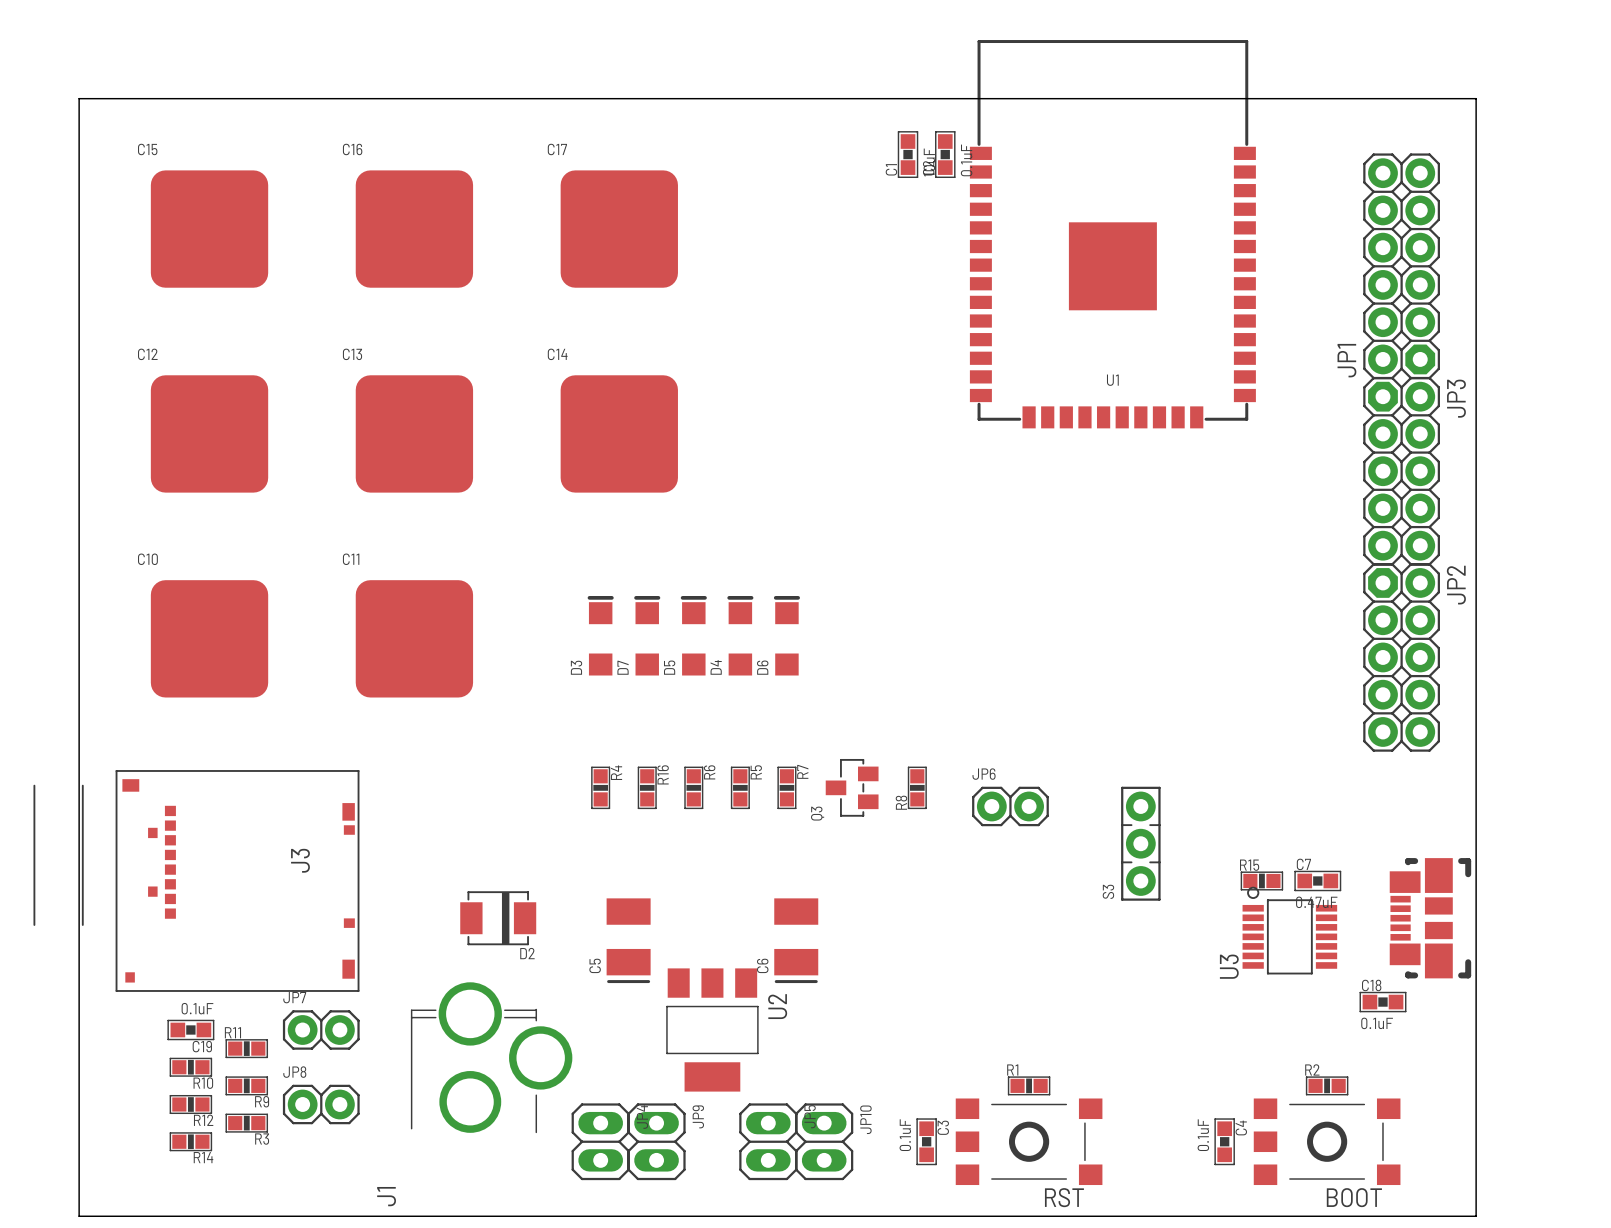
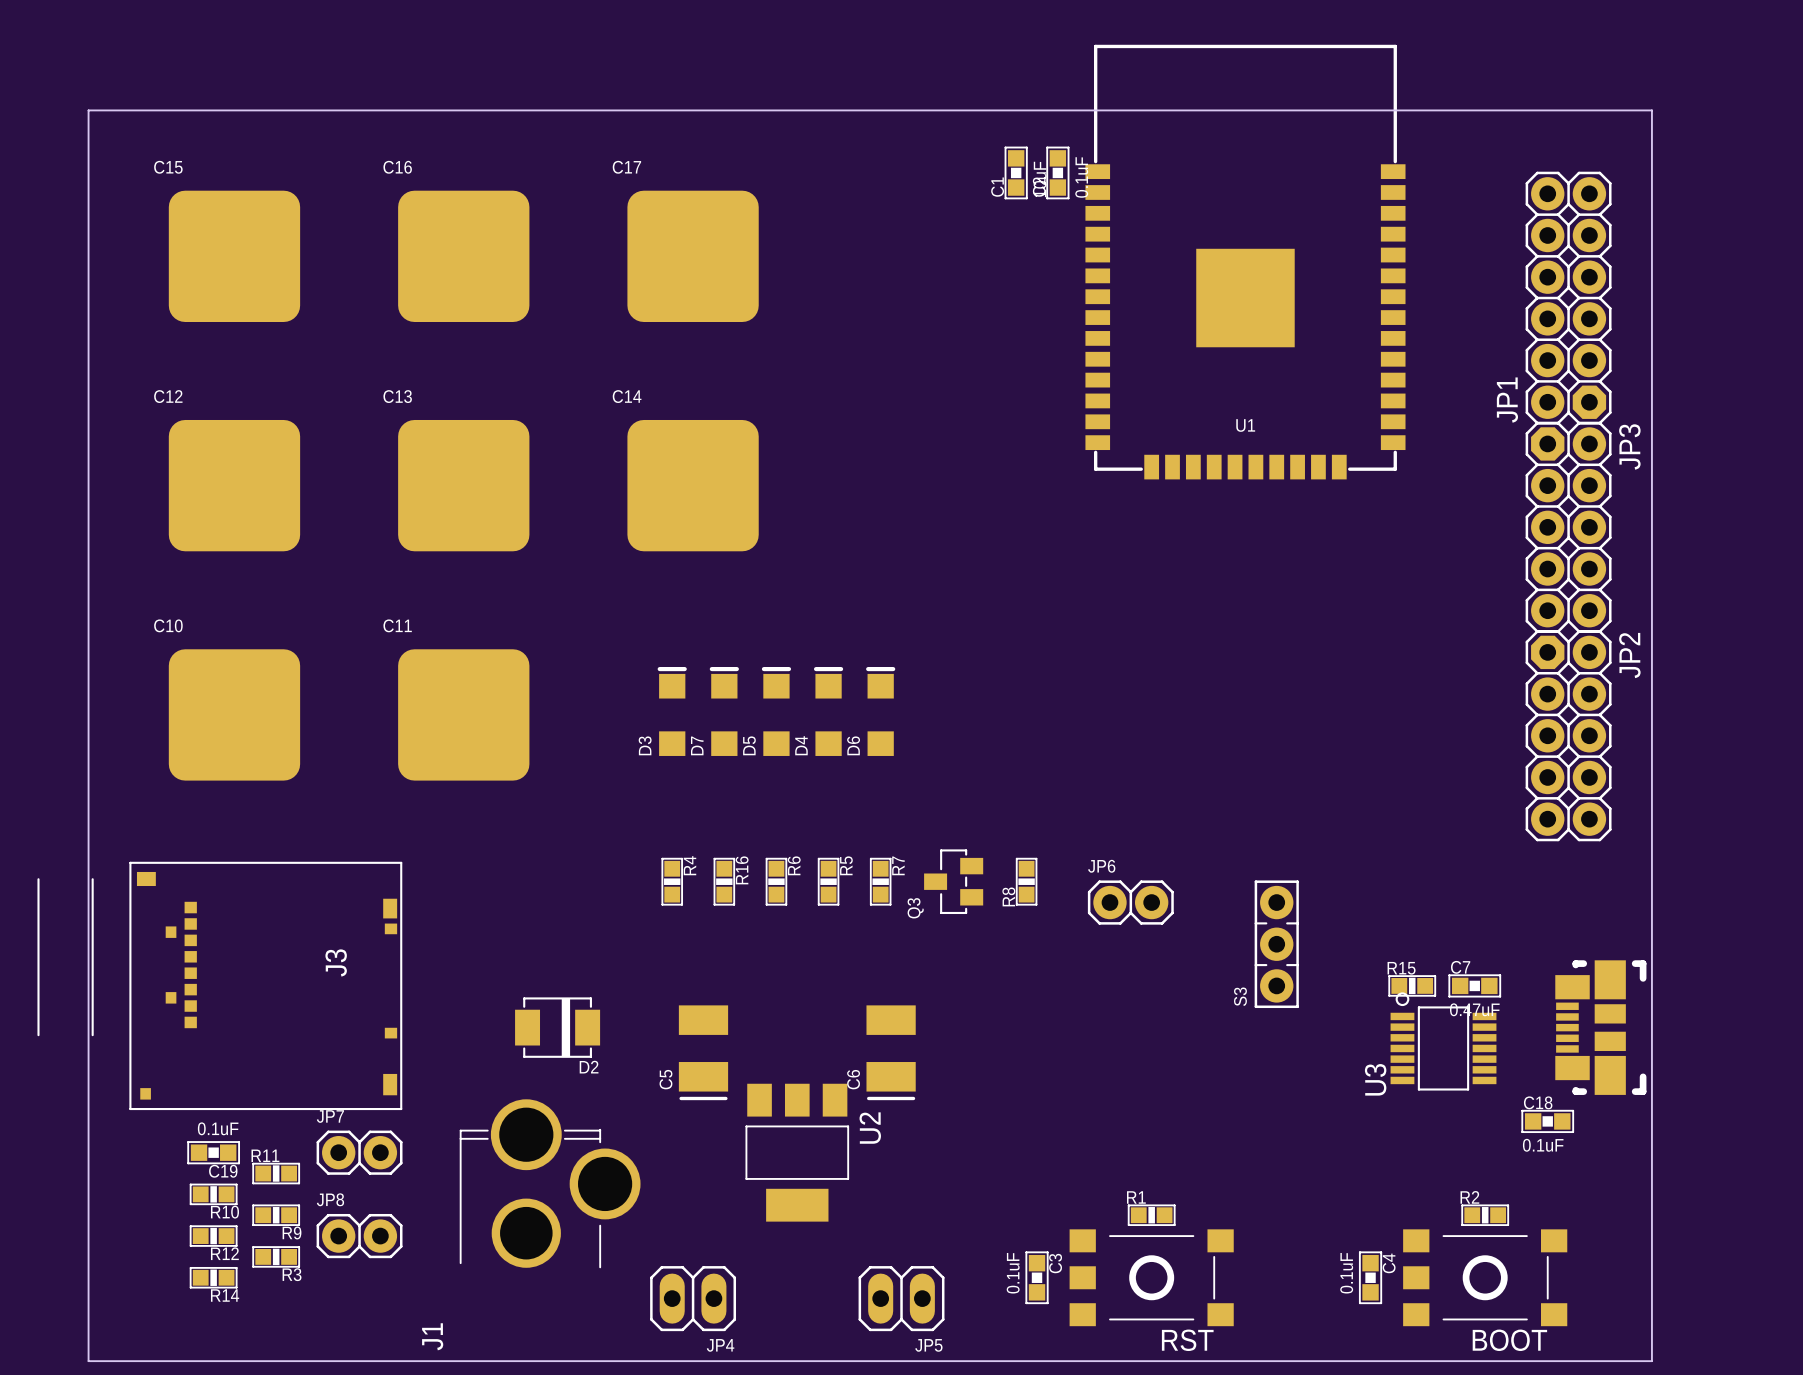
JP4 rotation: 0° (600, 1141) -> 90° clockwise (693, 1298)
JP9: (656, 1141) -> none
JP5 rotation: 0° (768, 1141) -> 90° clockwise (901, 1298)
JP10: (824, 1141) -> none

